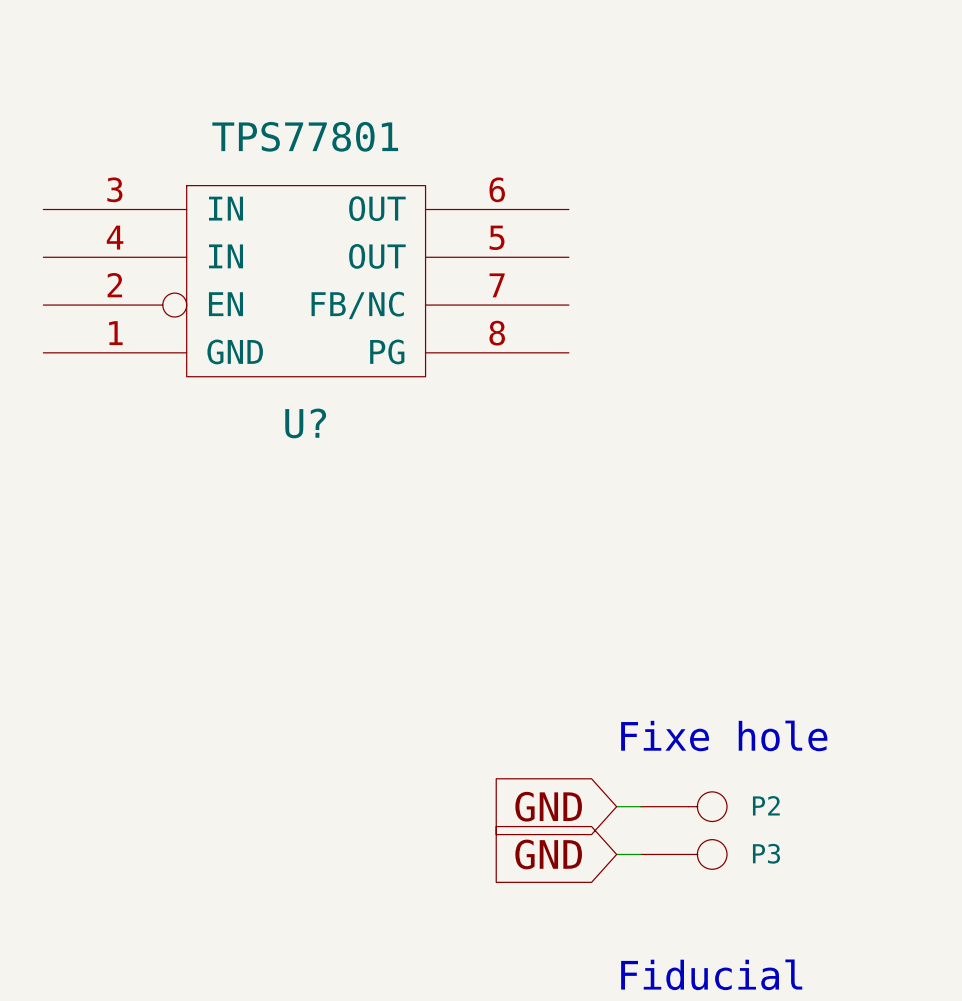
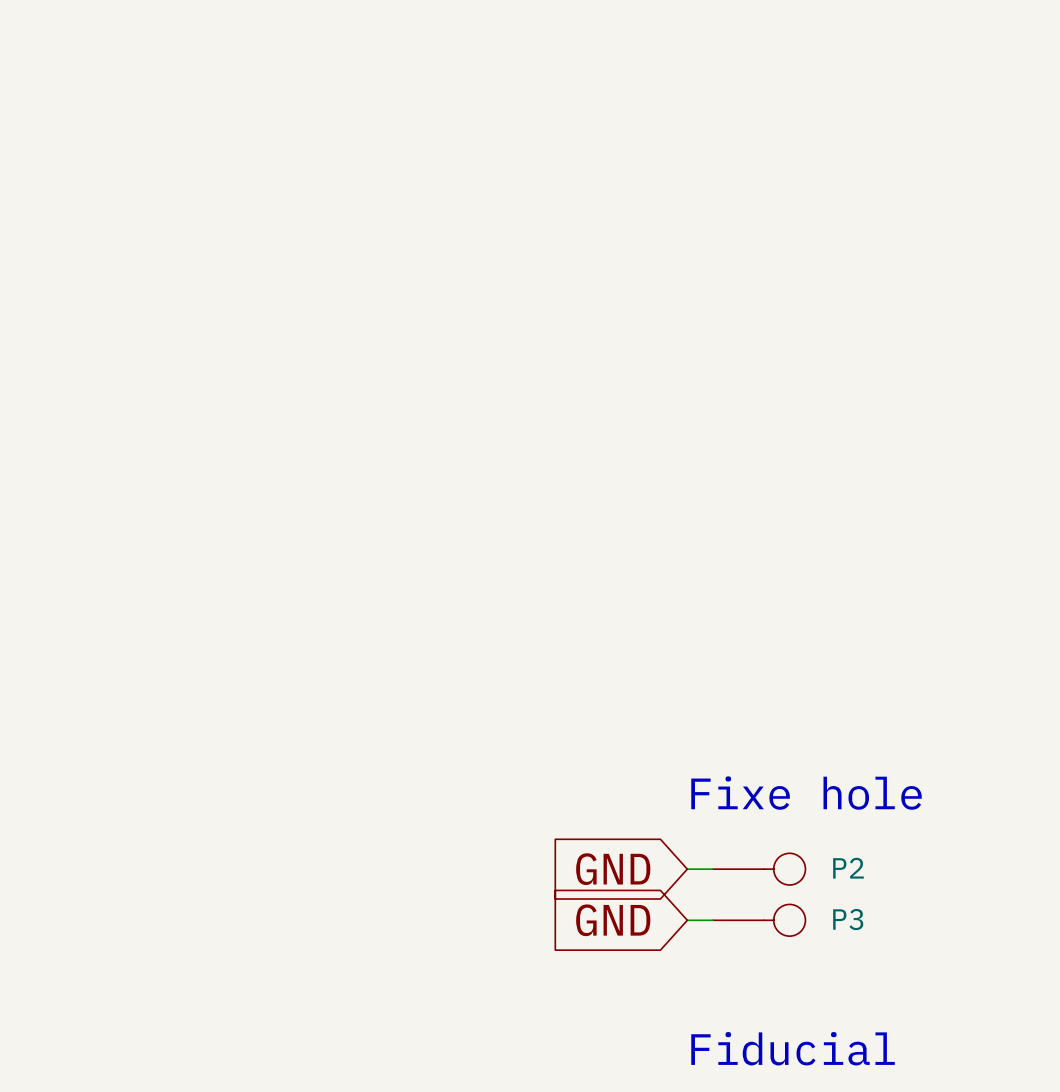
U?: TPS77801 (306, 281) -> none

